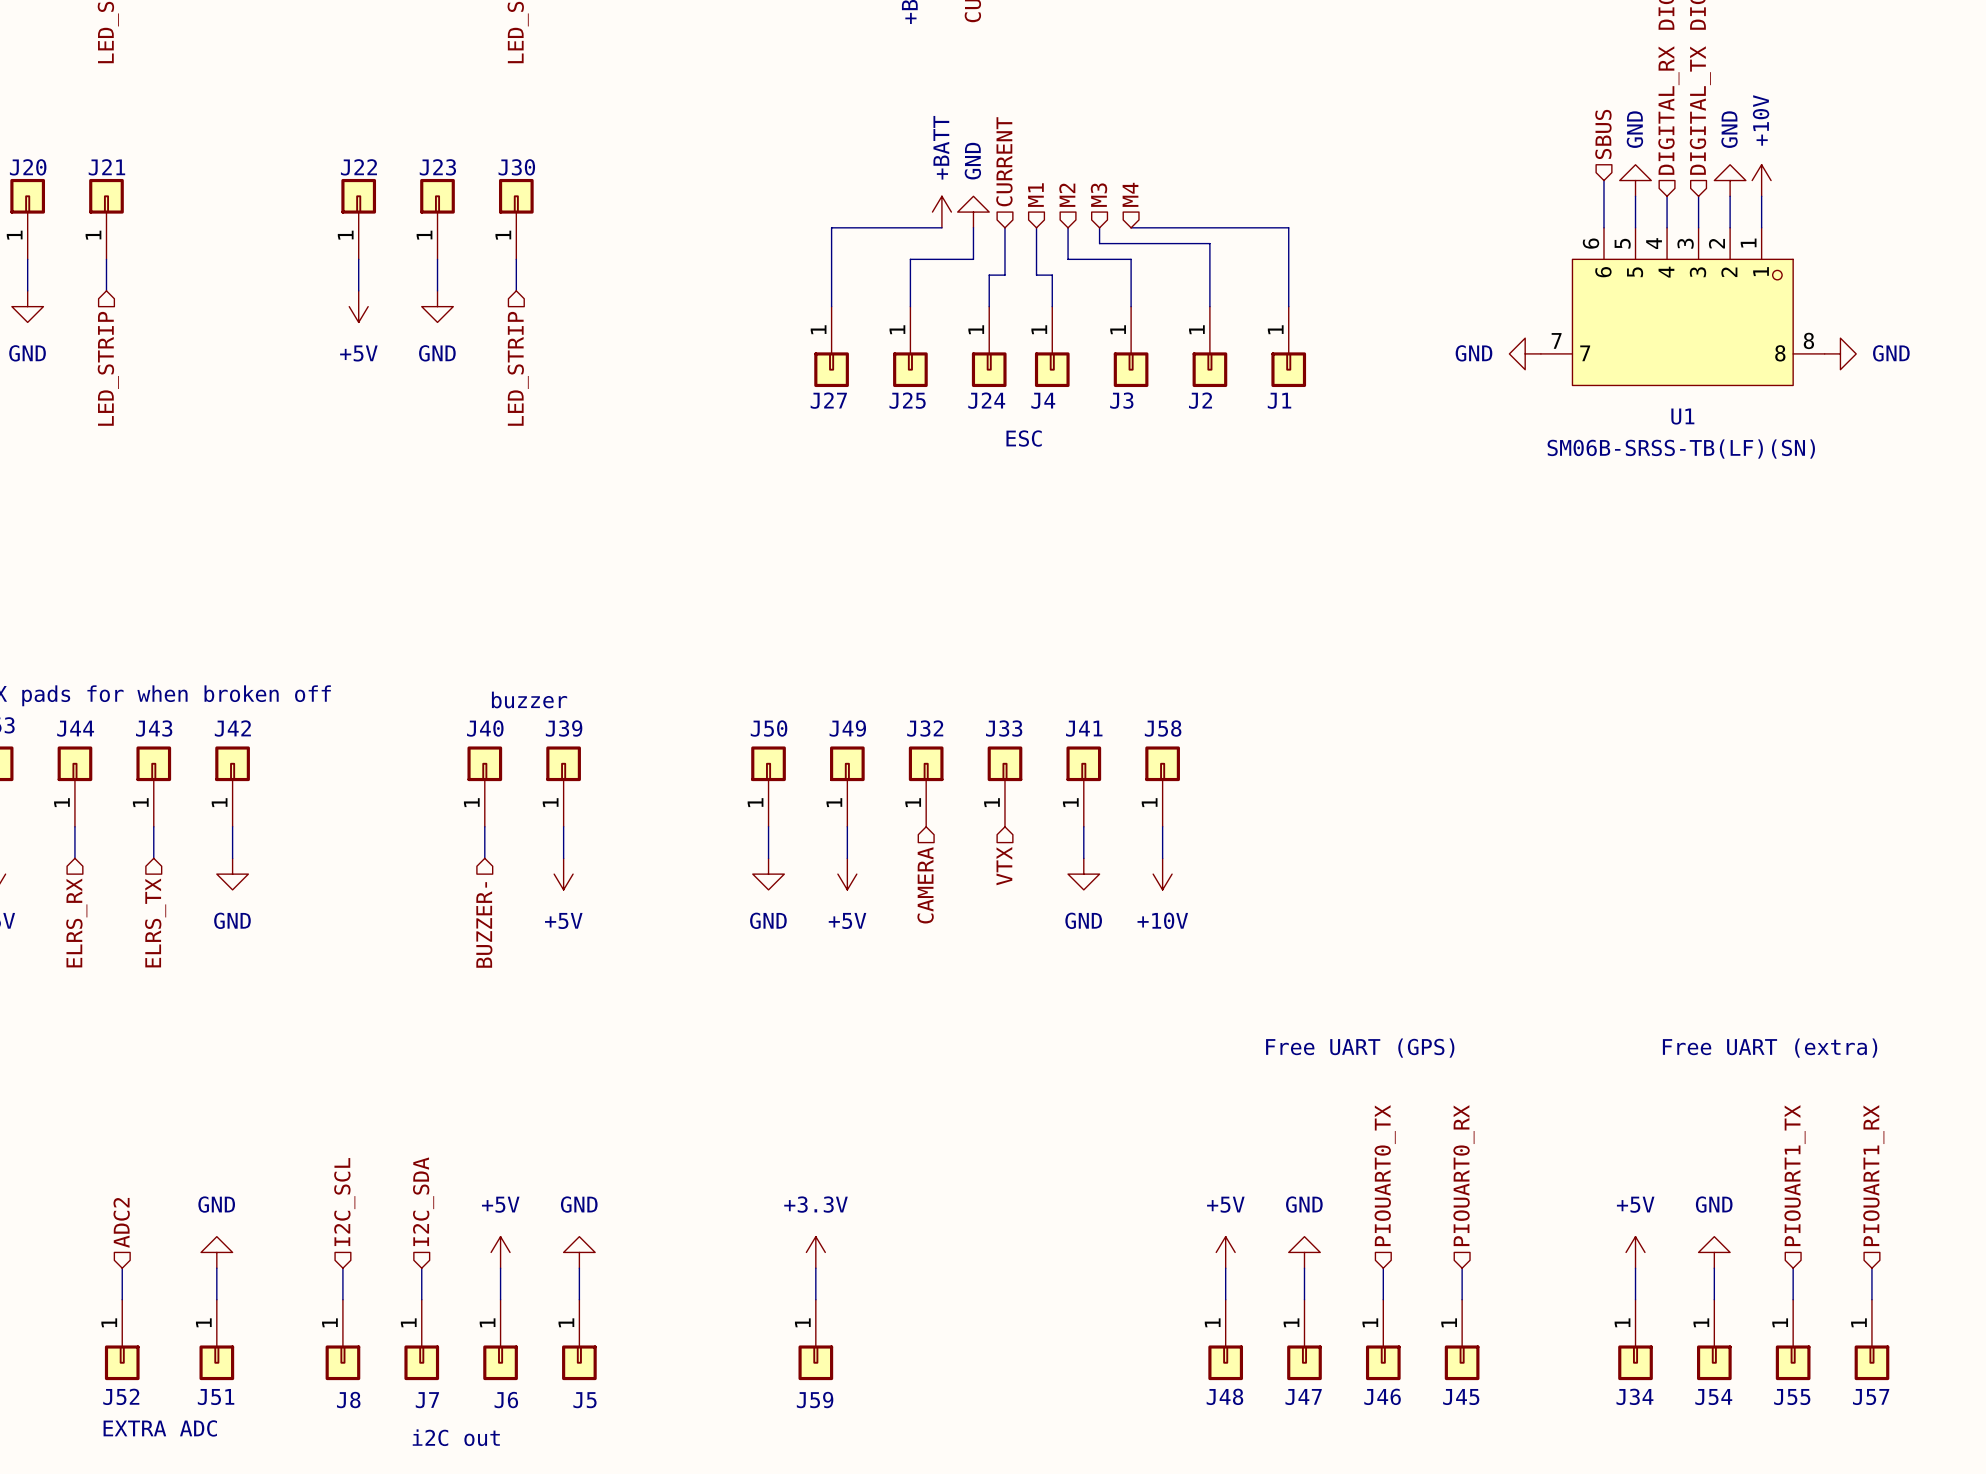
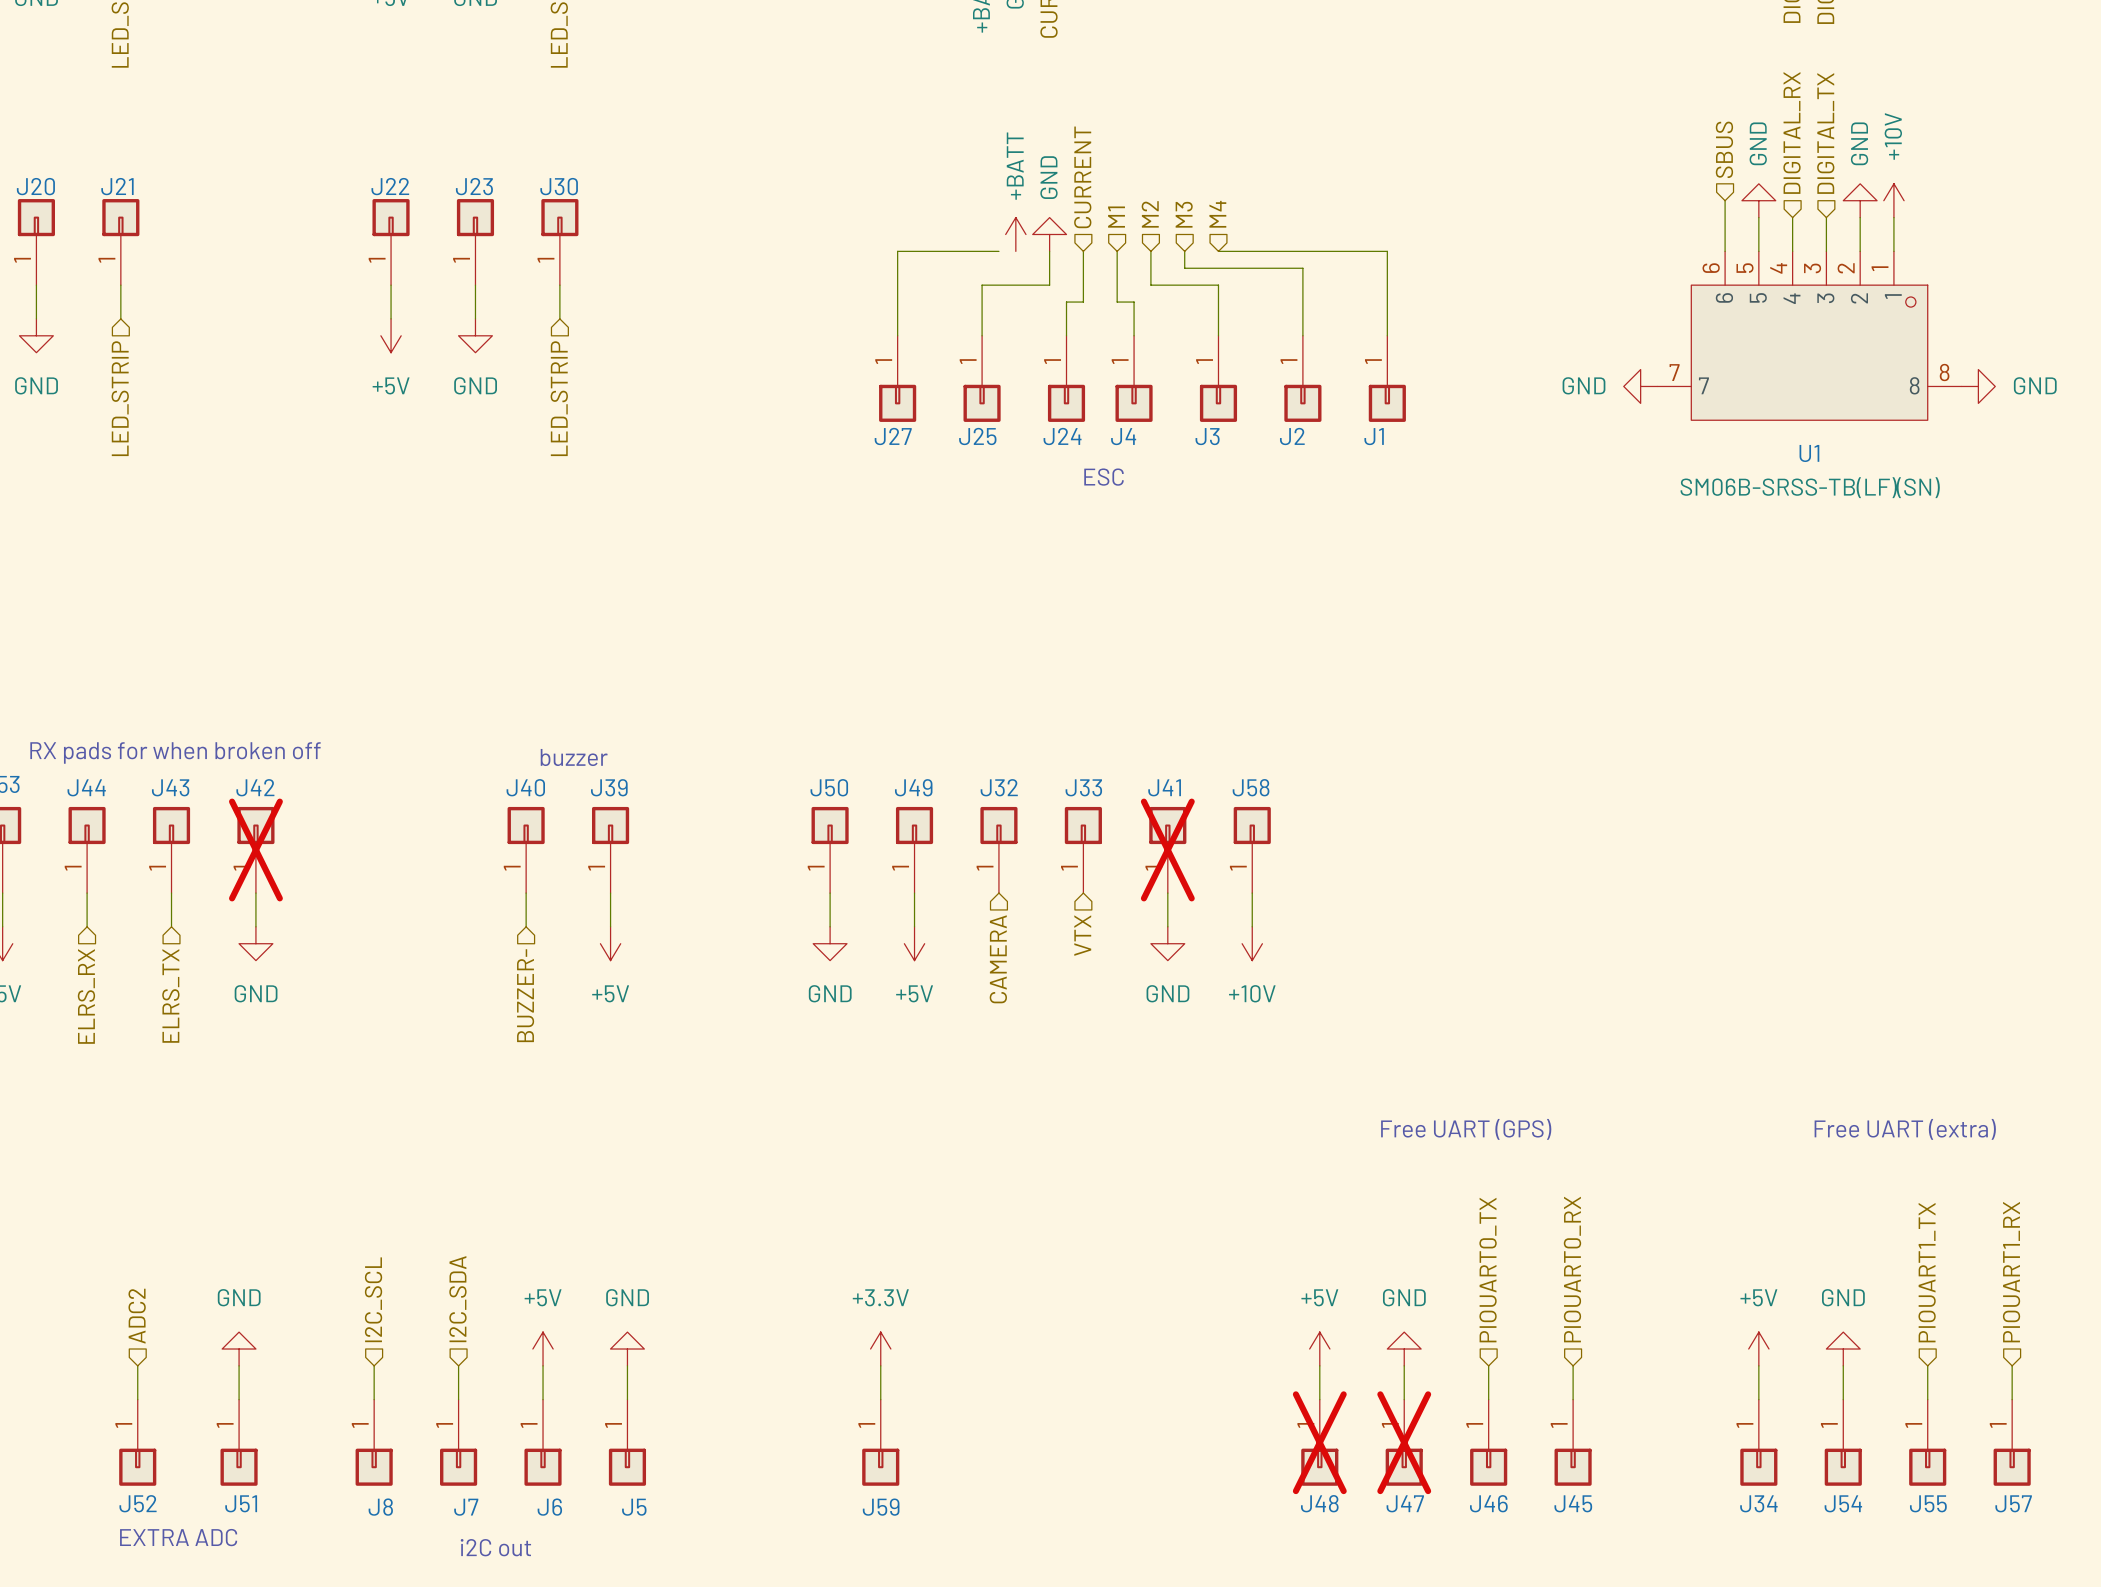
wire: (926, 227) (941, 227) -> none
J42 do-not-place cross: none -> (255, 850)
J41 do-not-place cross: none -> (1167, 850)
J48 do-not-place cross: none -> (1319, 1442)
J47 do-not-place cross: none -> (1404, 1442)

